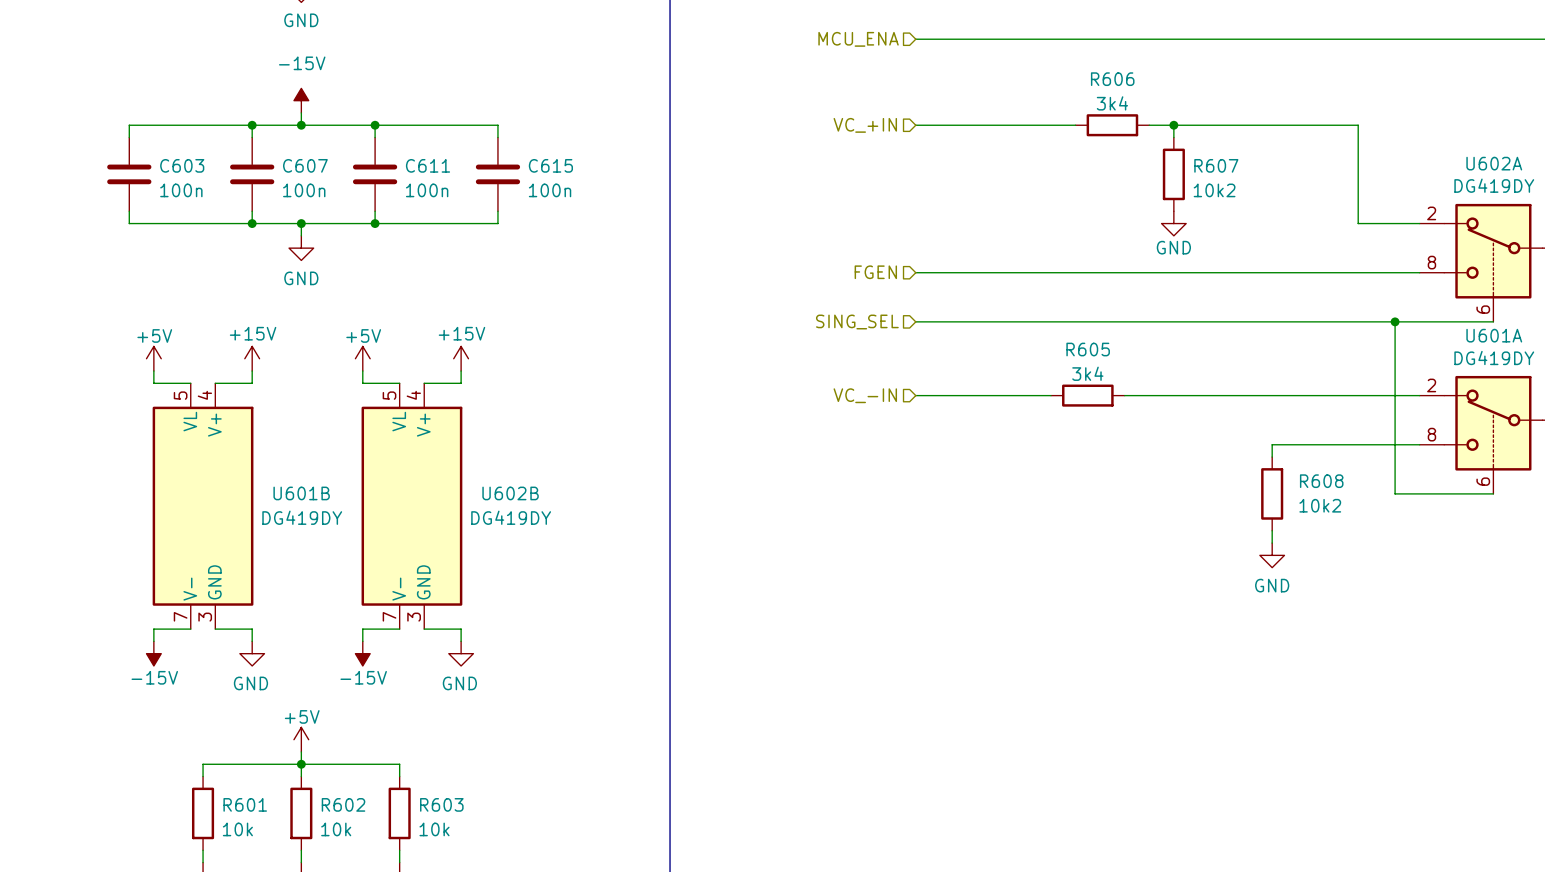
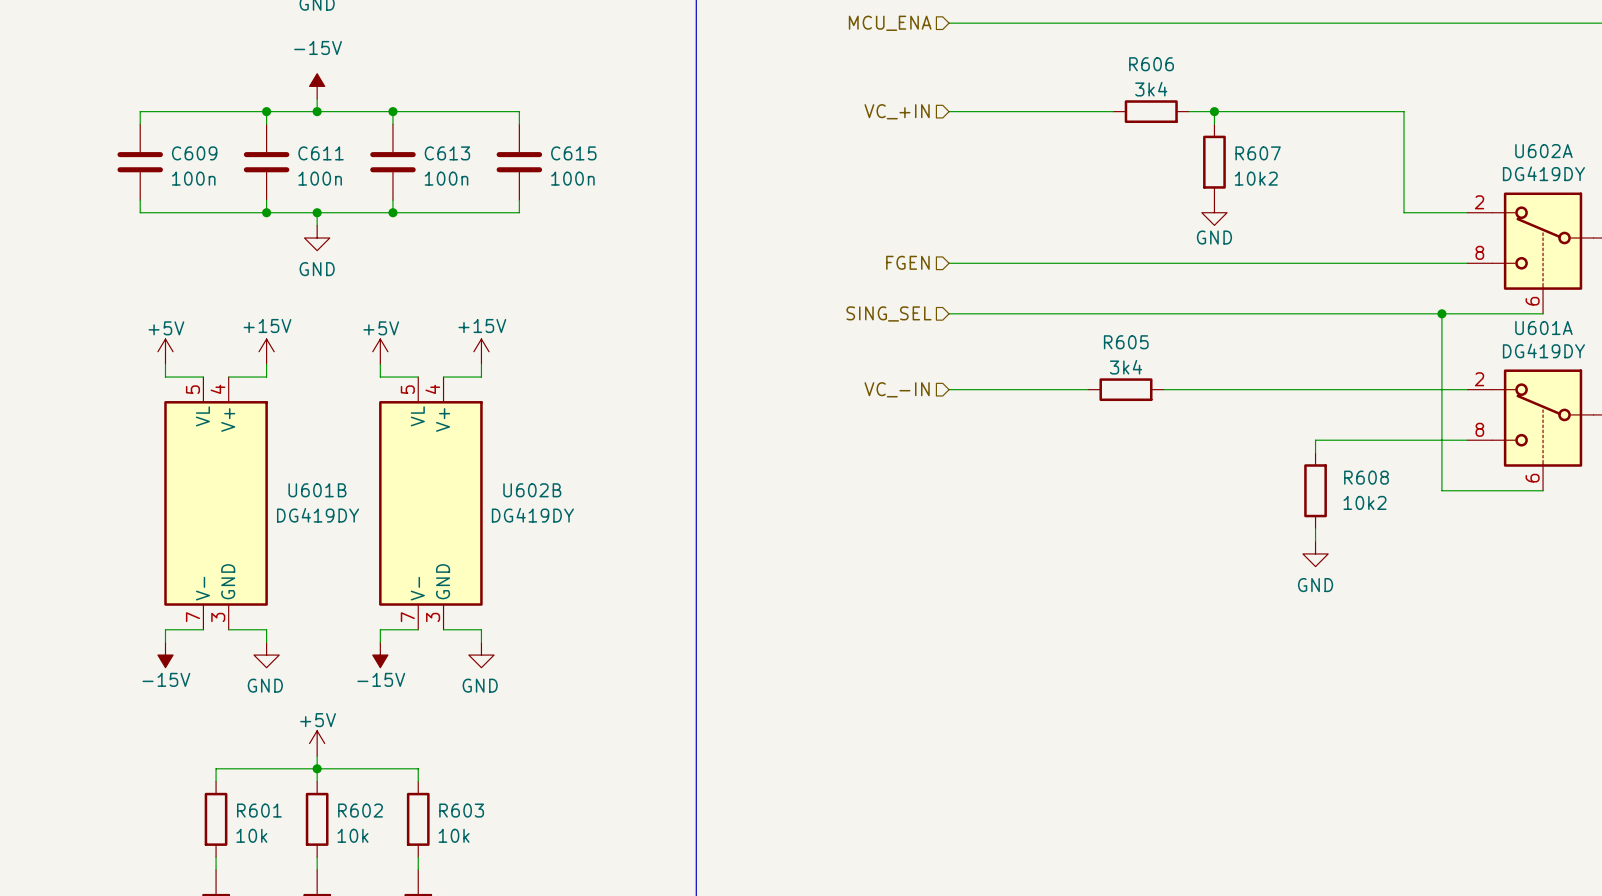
C603 name: C603 (182, 165) -> C609 (194, 153)
C607 name: C607 (305, 165) -> C611 (321, 153)
C611 name: C611 (428, 165) -> C613 (447, 153)

